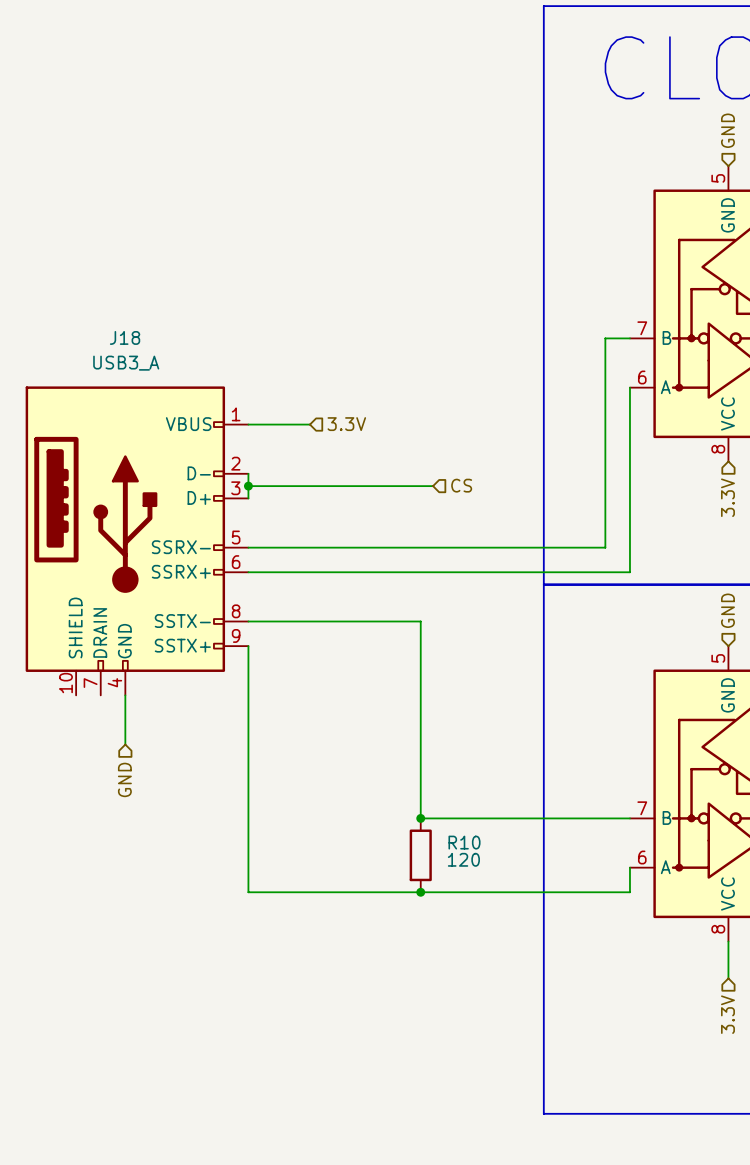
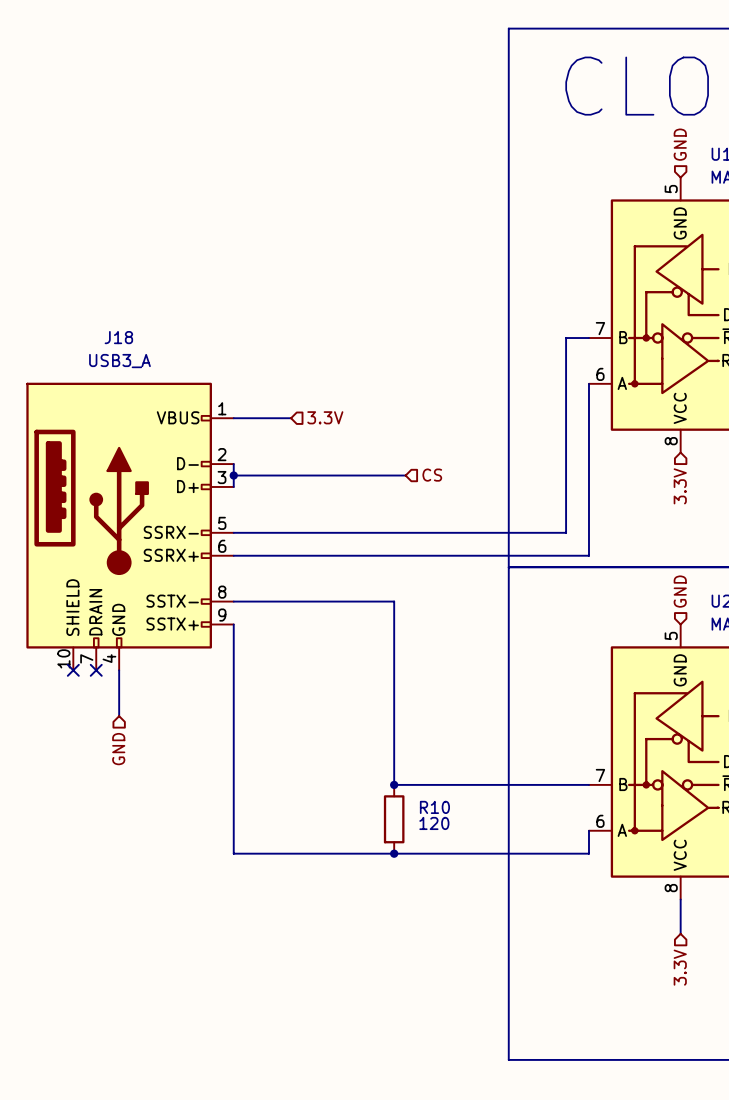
no-connect mark: none -> (73, 670)
no-connect mark: none -> (96, 670)

